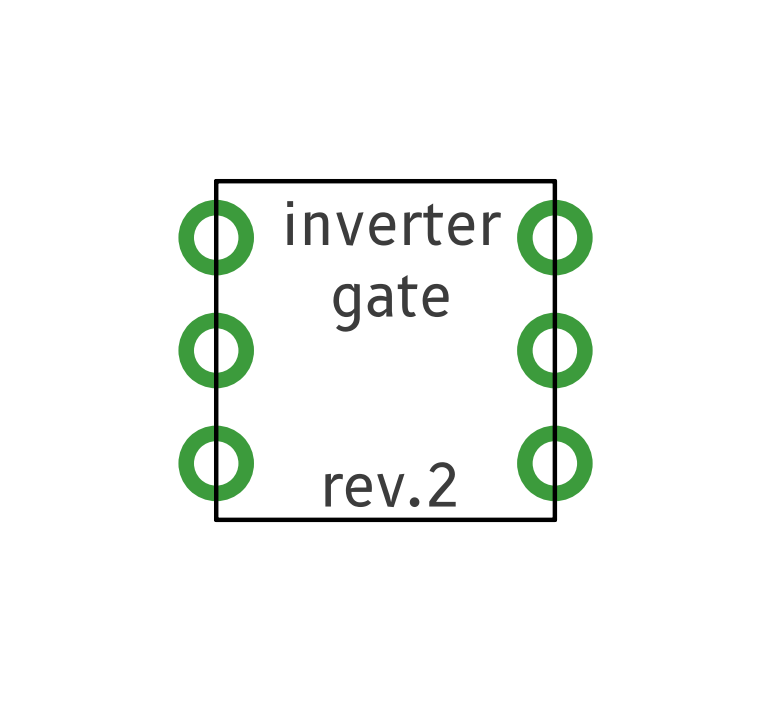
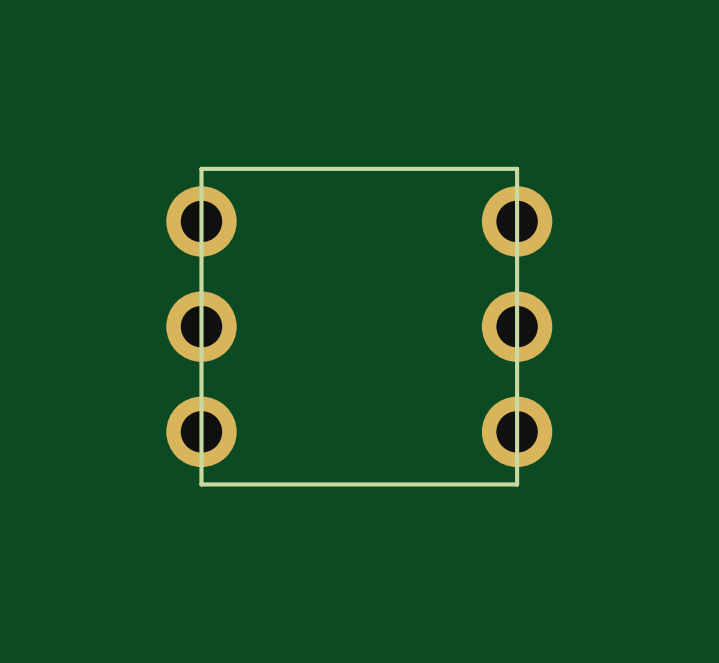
text: inverter (394, 223) -> none
text: gate (391, 303) -> none
text: rev.2 (390, 484) -> none

